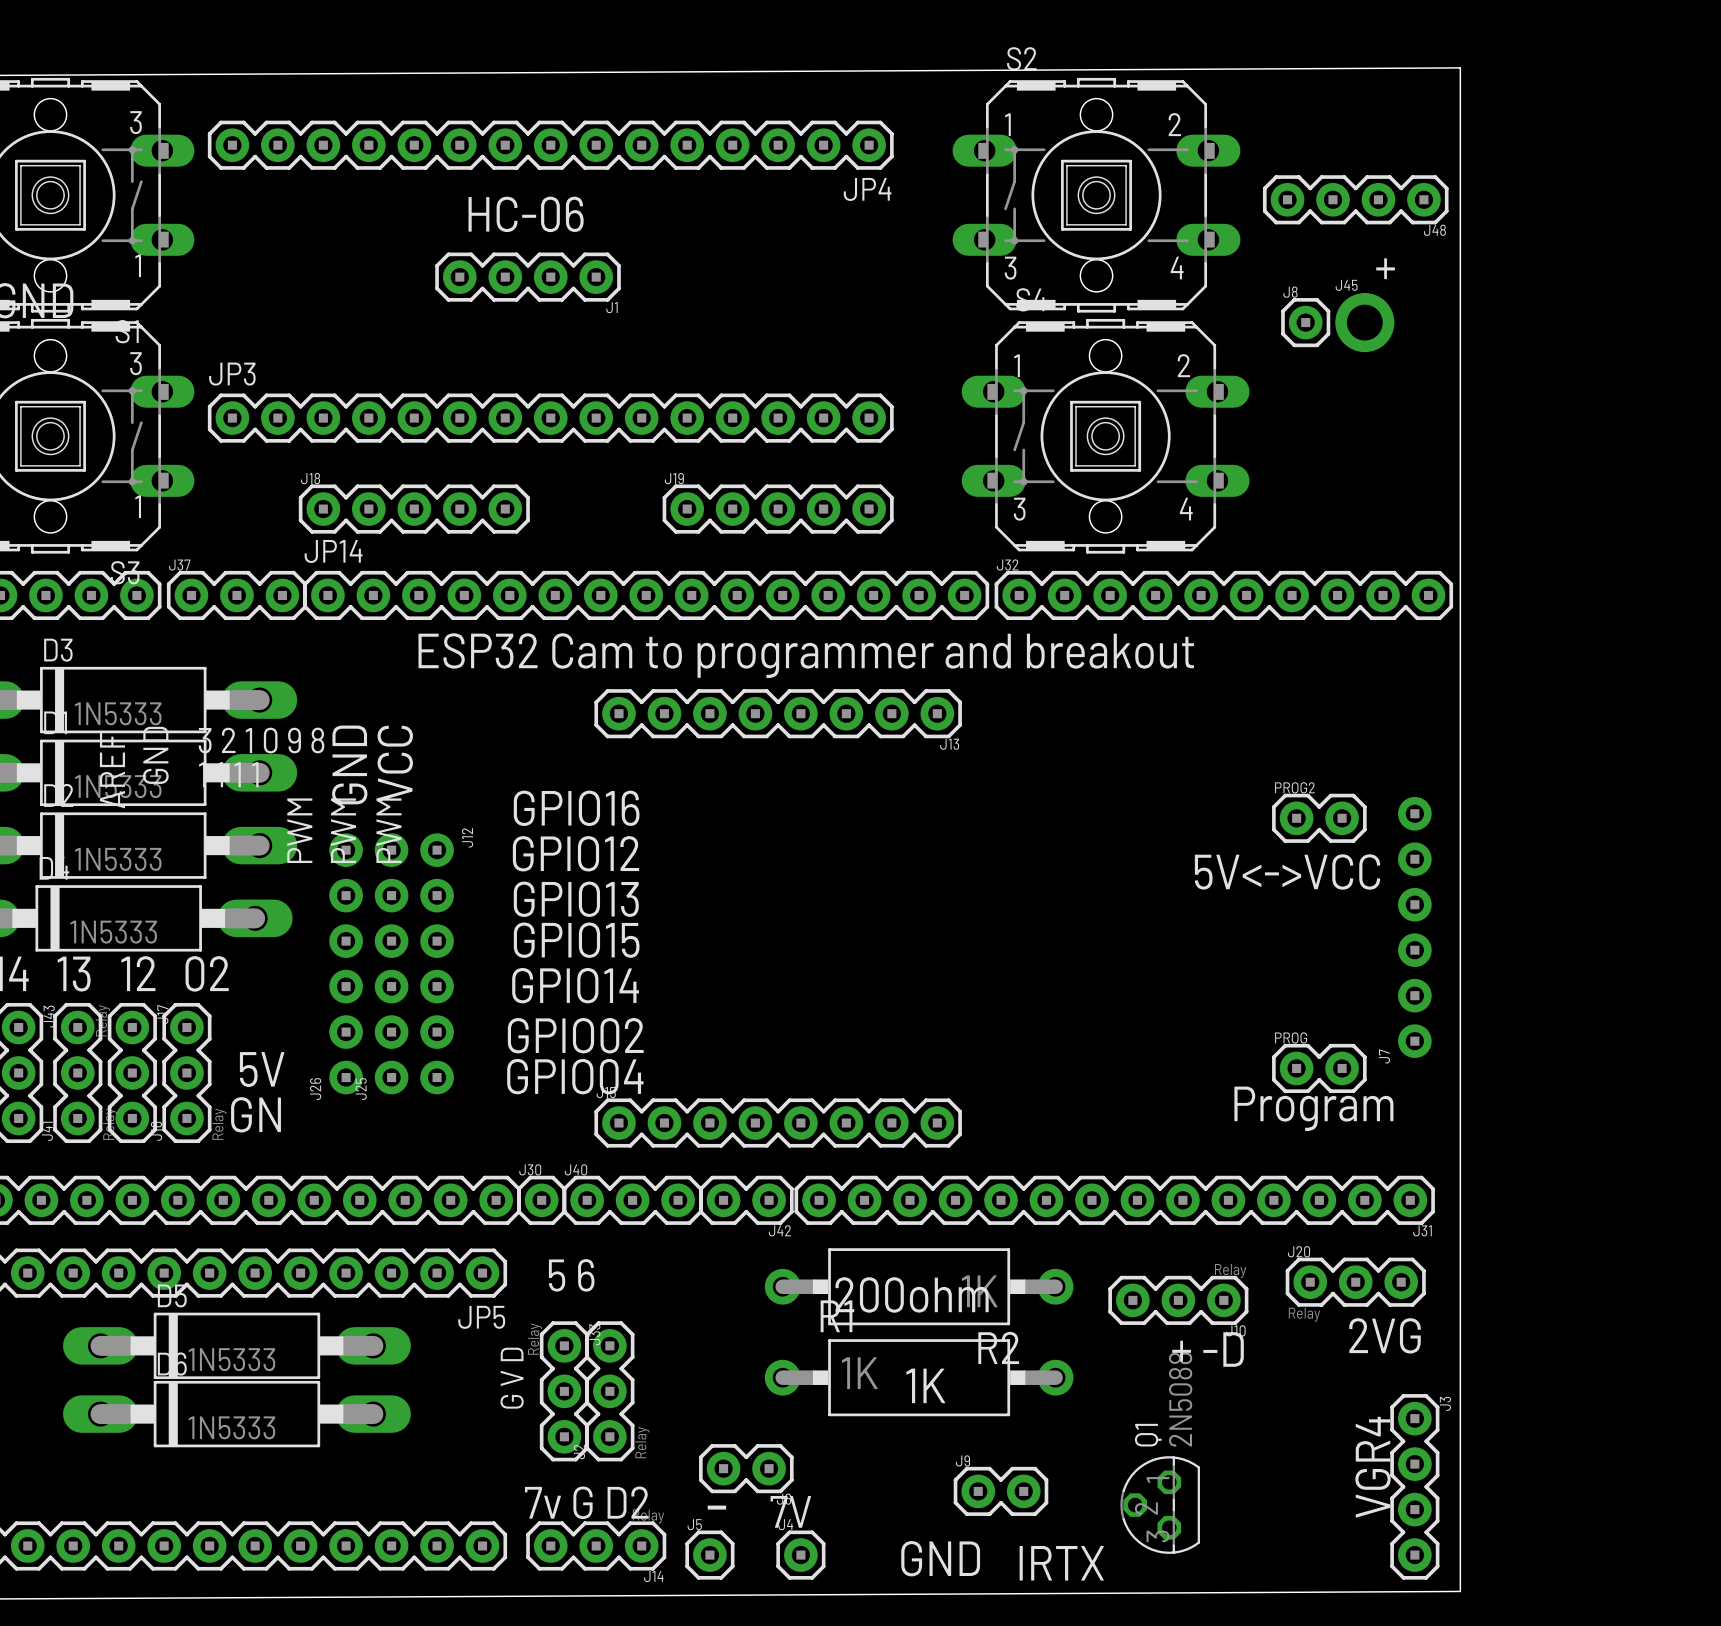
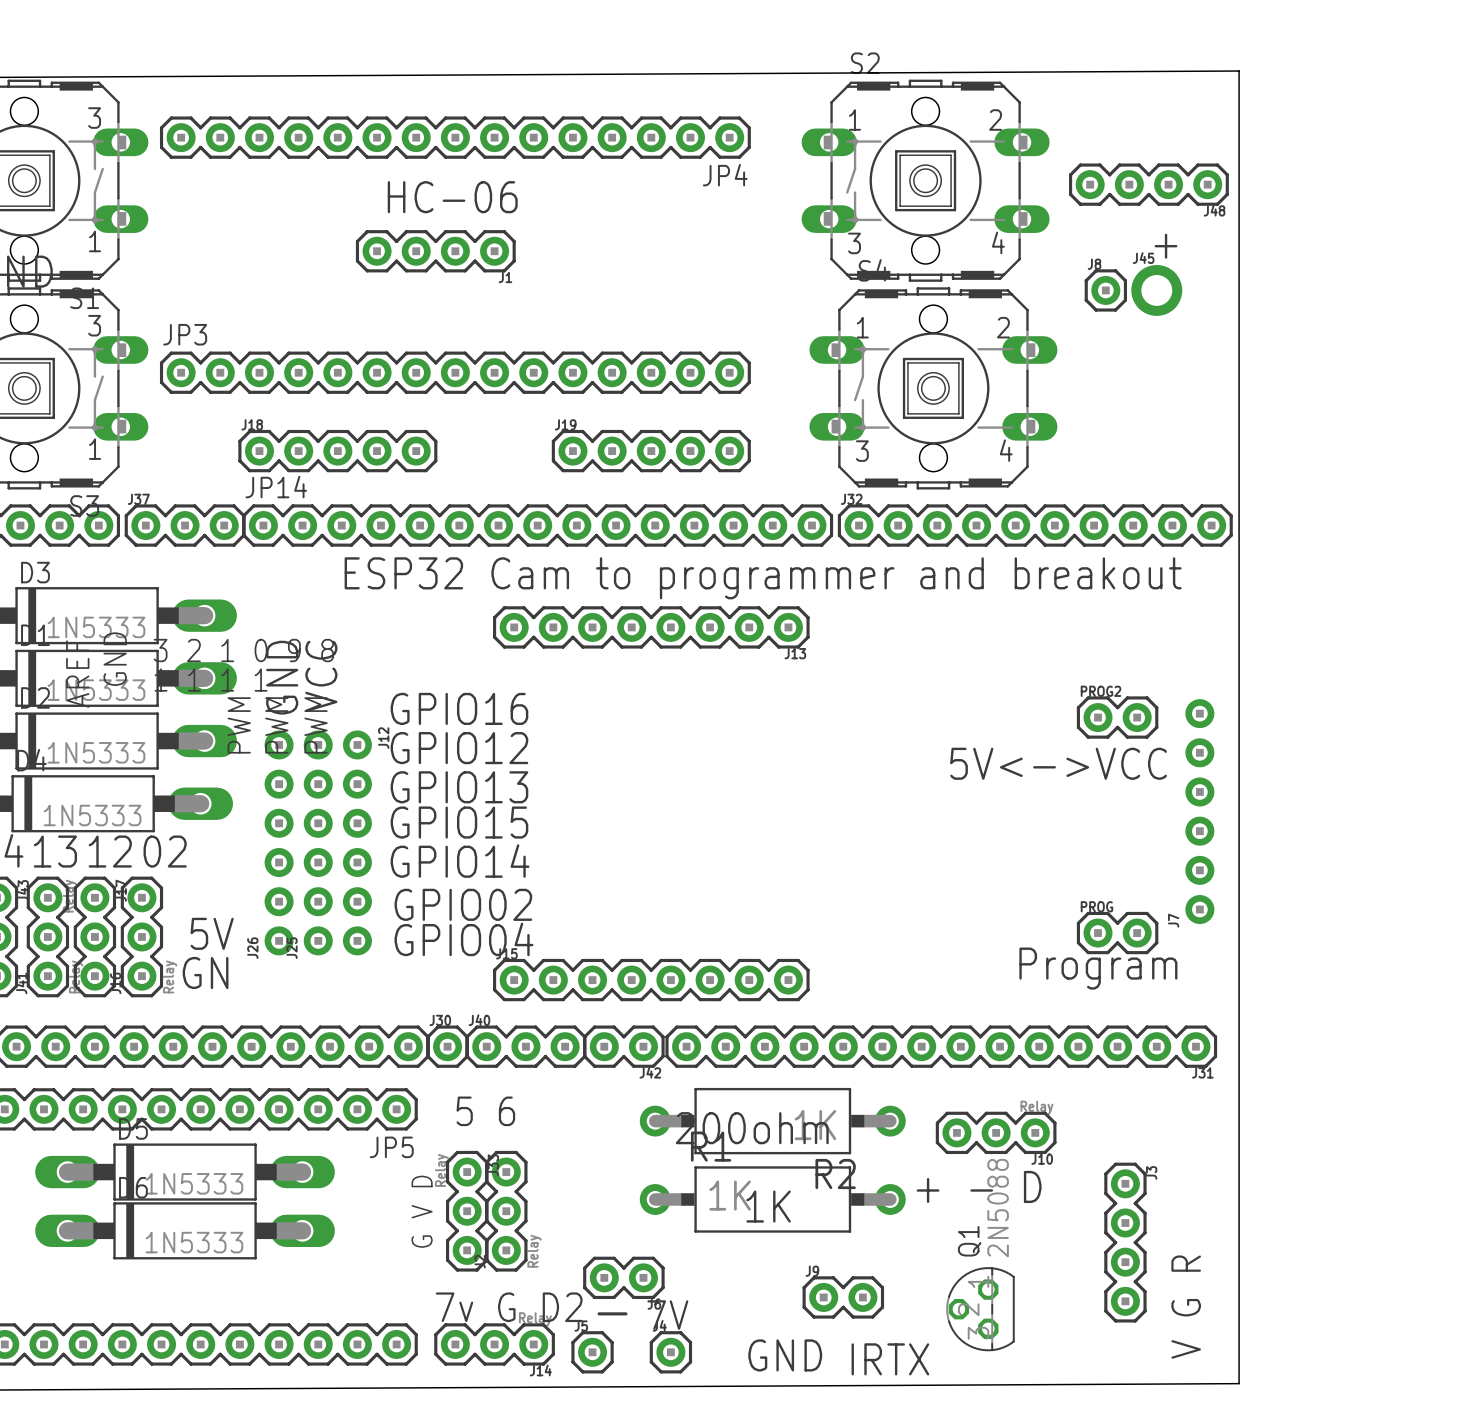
J20: Relay (1355, 1282) -> none
text: 2VG (1385, 1335) -> none
text: + -D (1208, 1349) -> + - D (979, 1186)
text: VGR4 (1373, 1467) -> V G R (1186, 1307)
J3 position: (1414, 1486) -> (1125, 1242)

